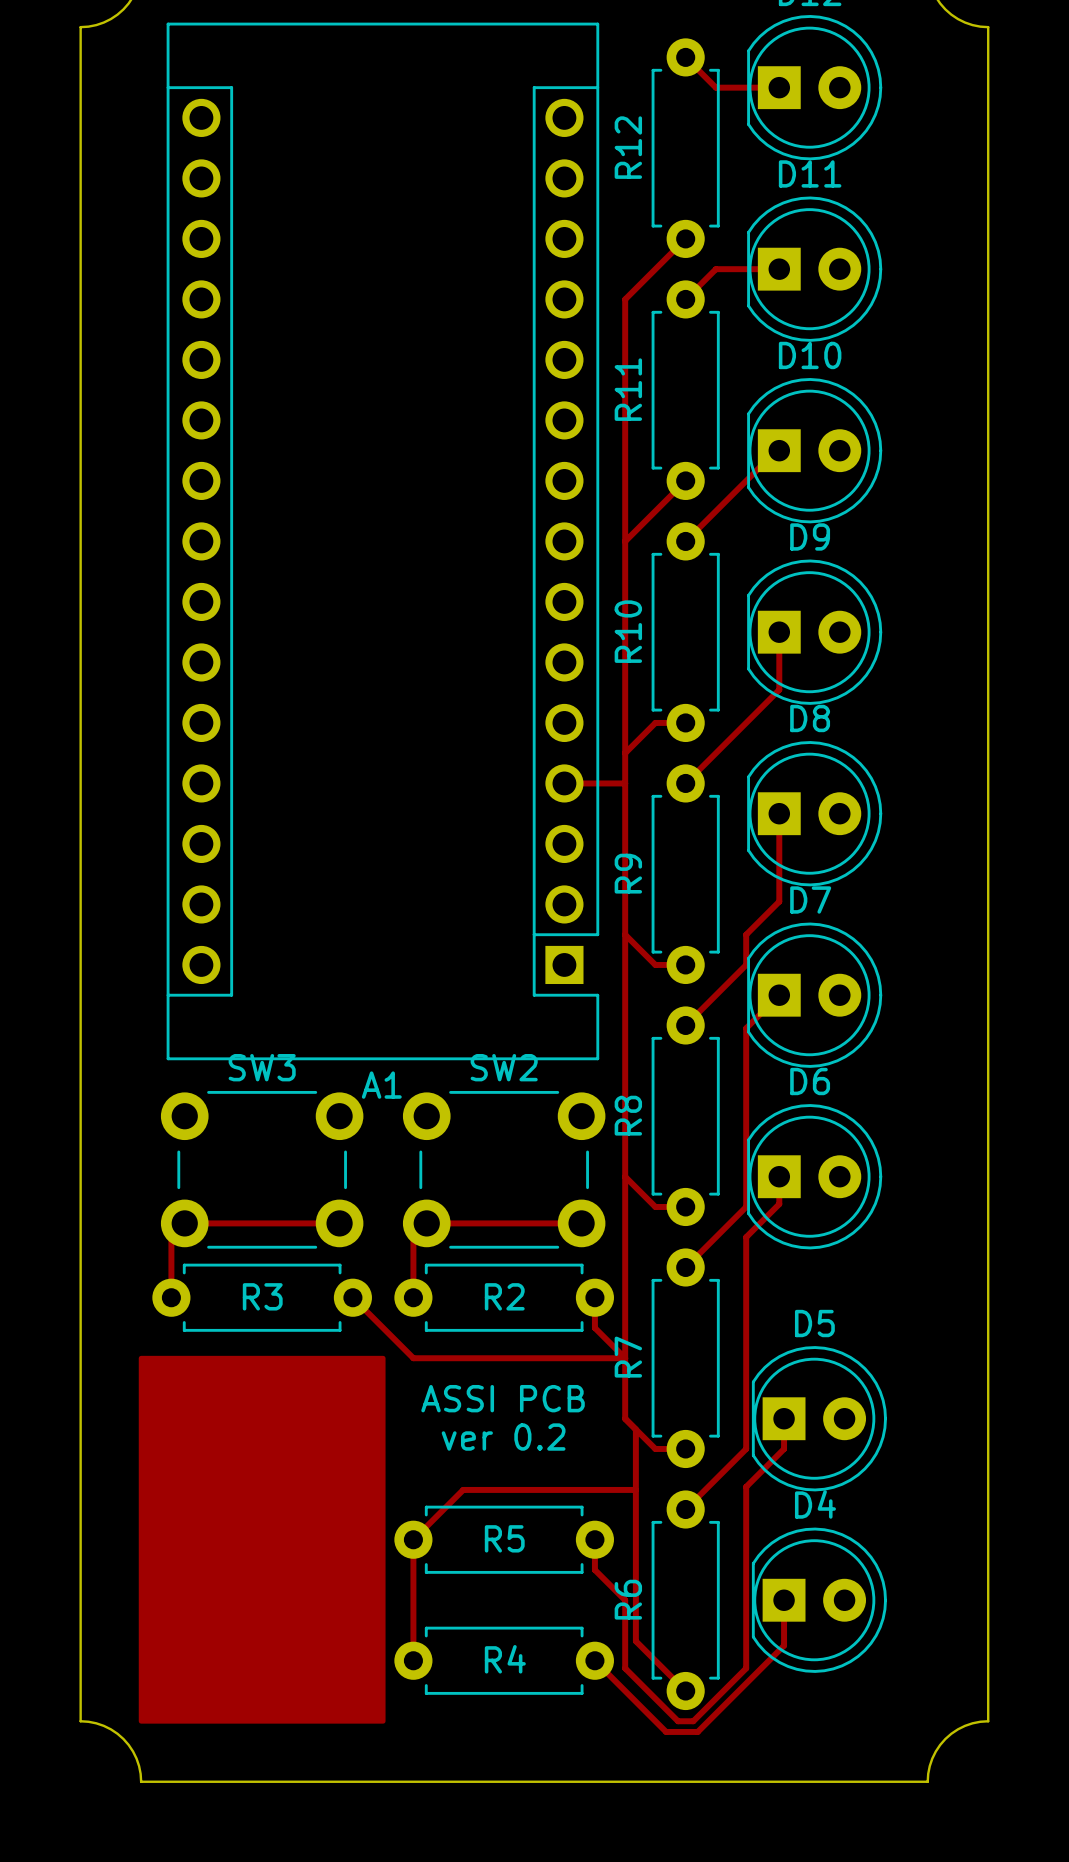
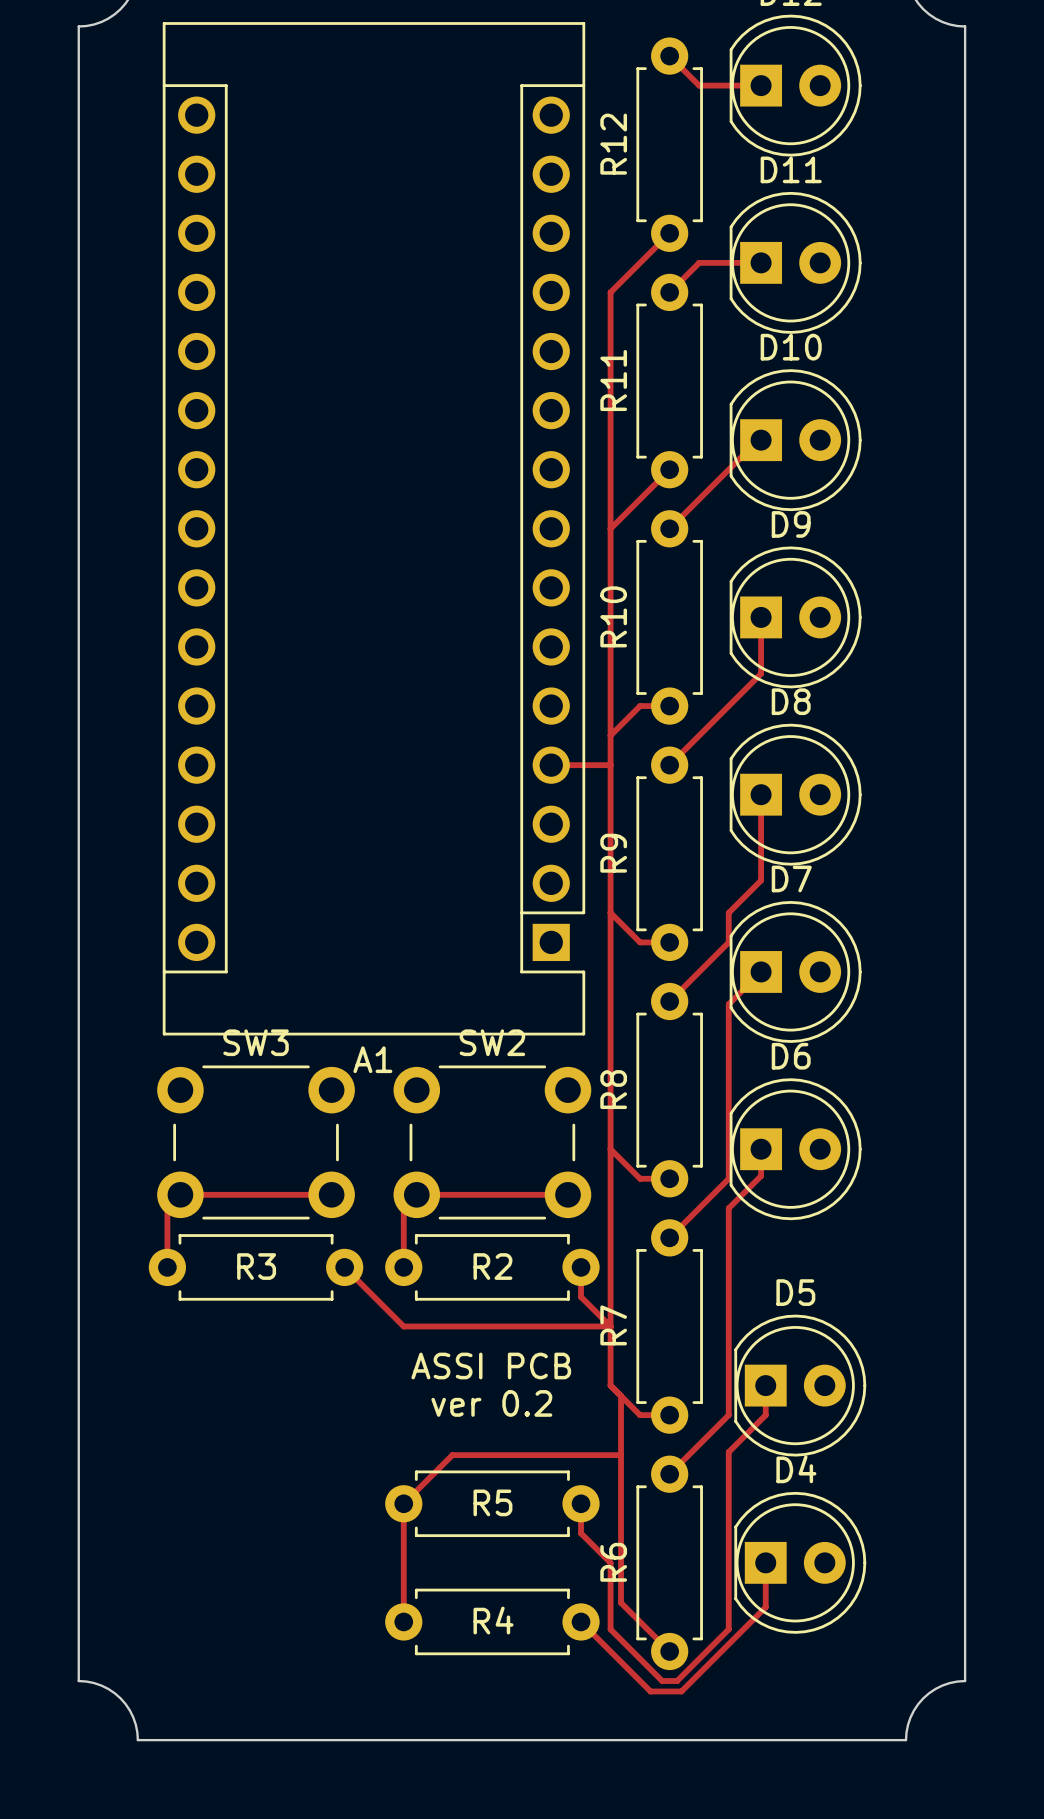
drawing: [138, 1355, 386, 1724] -> none

